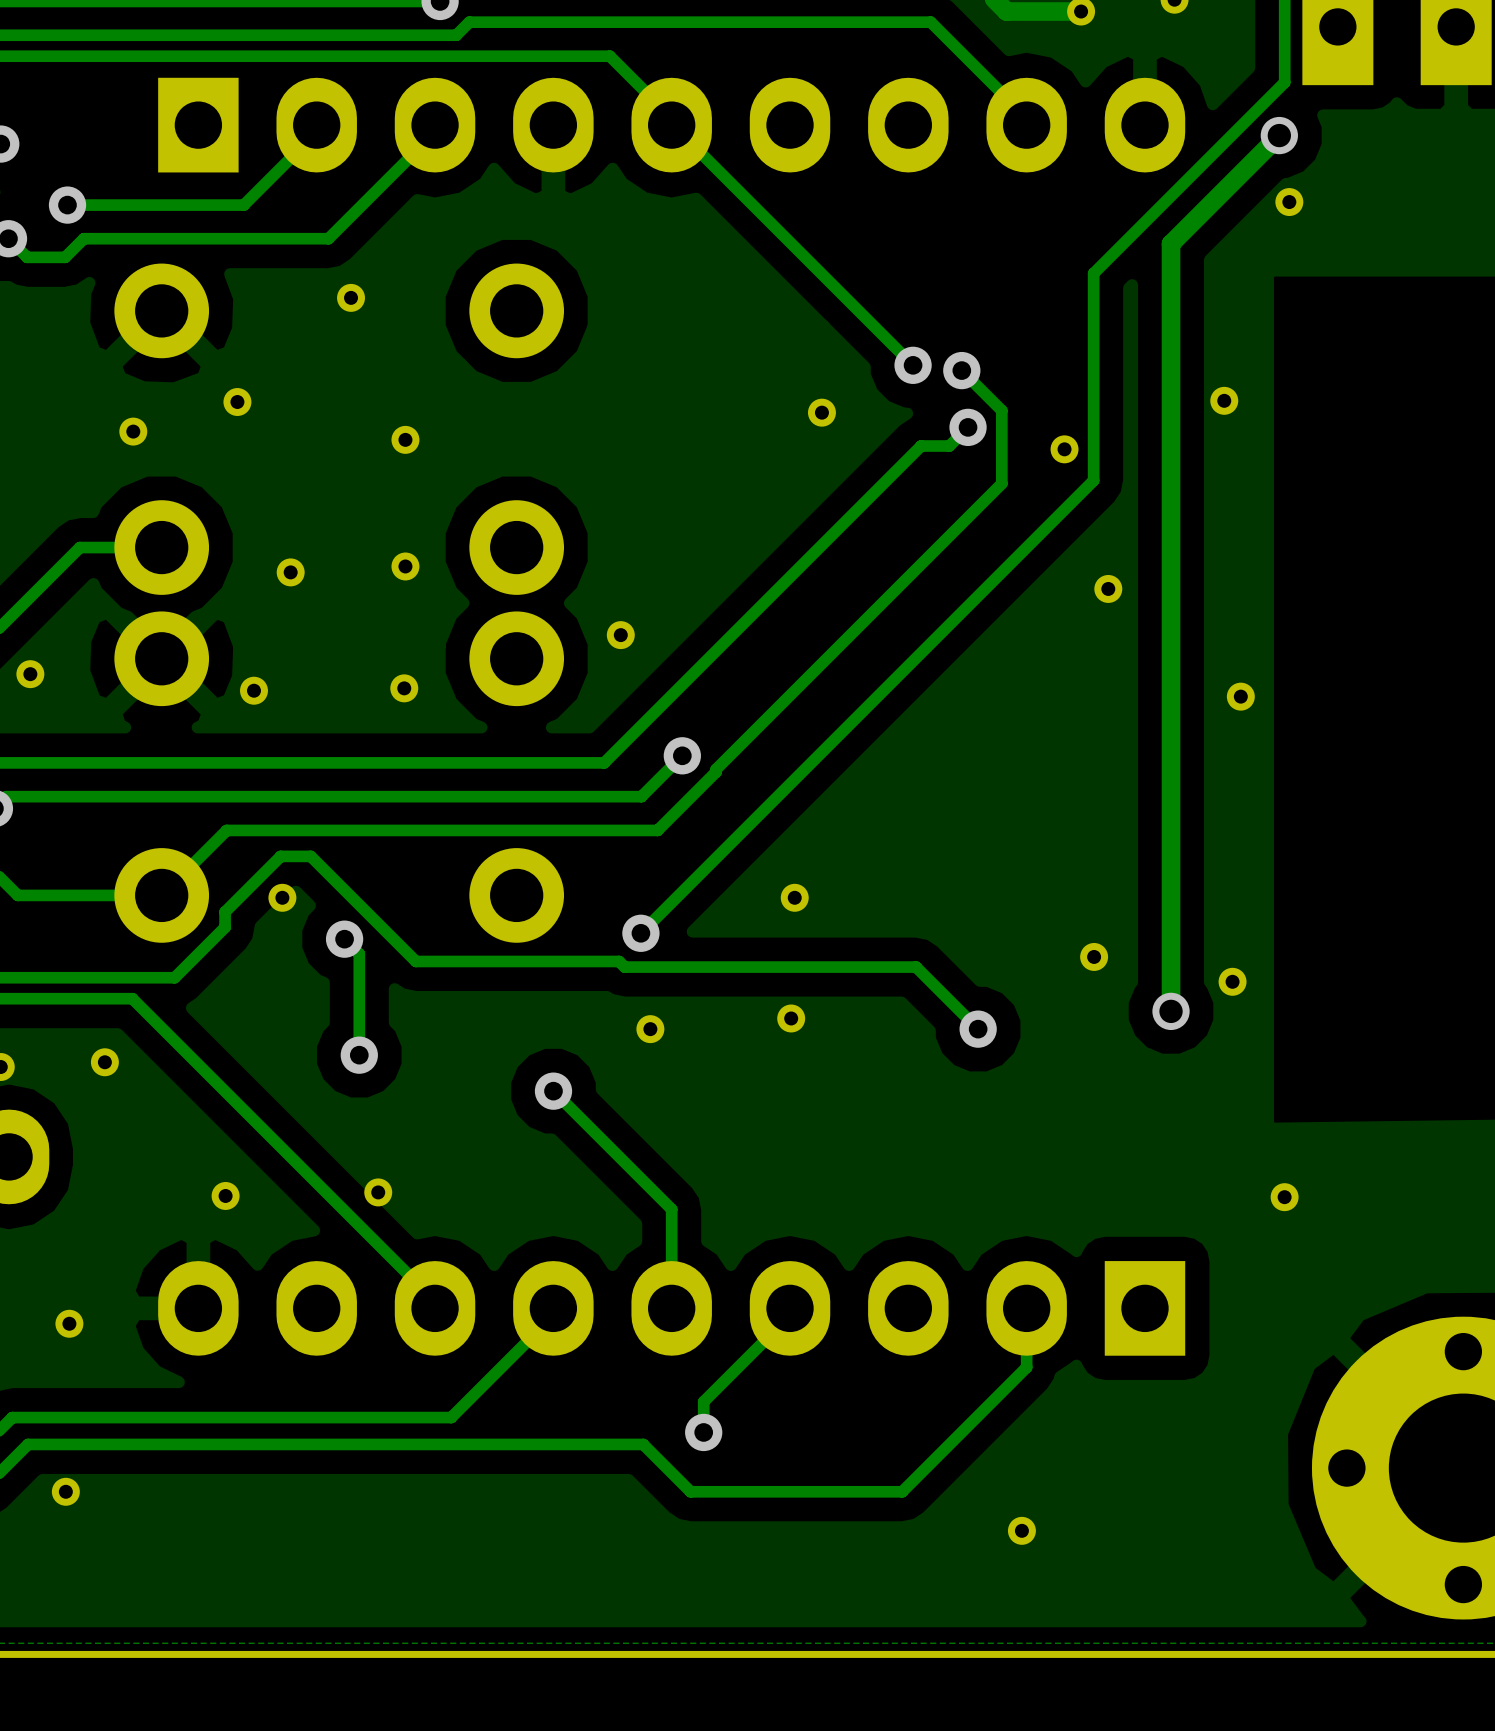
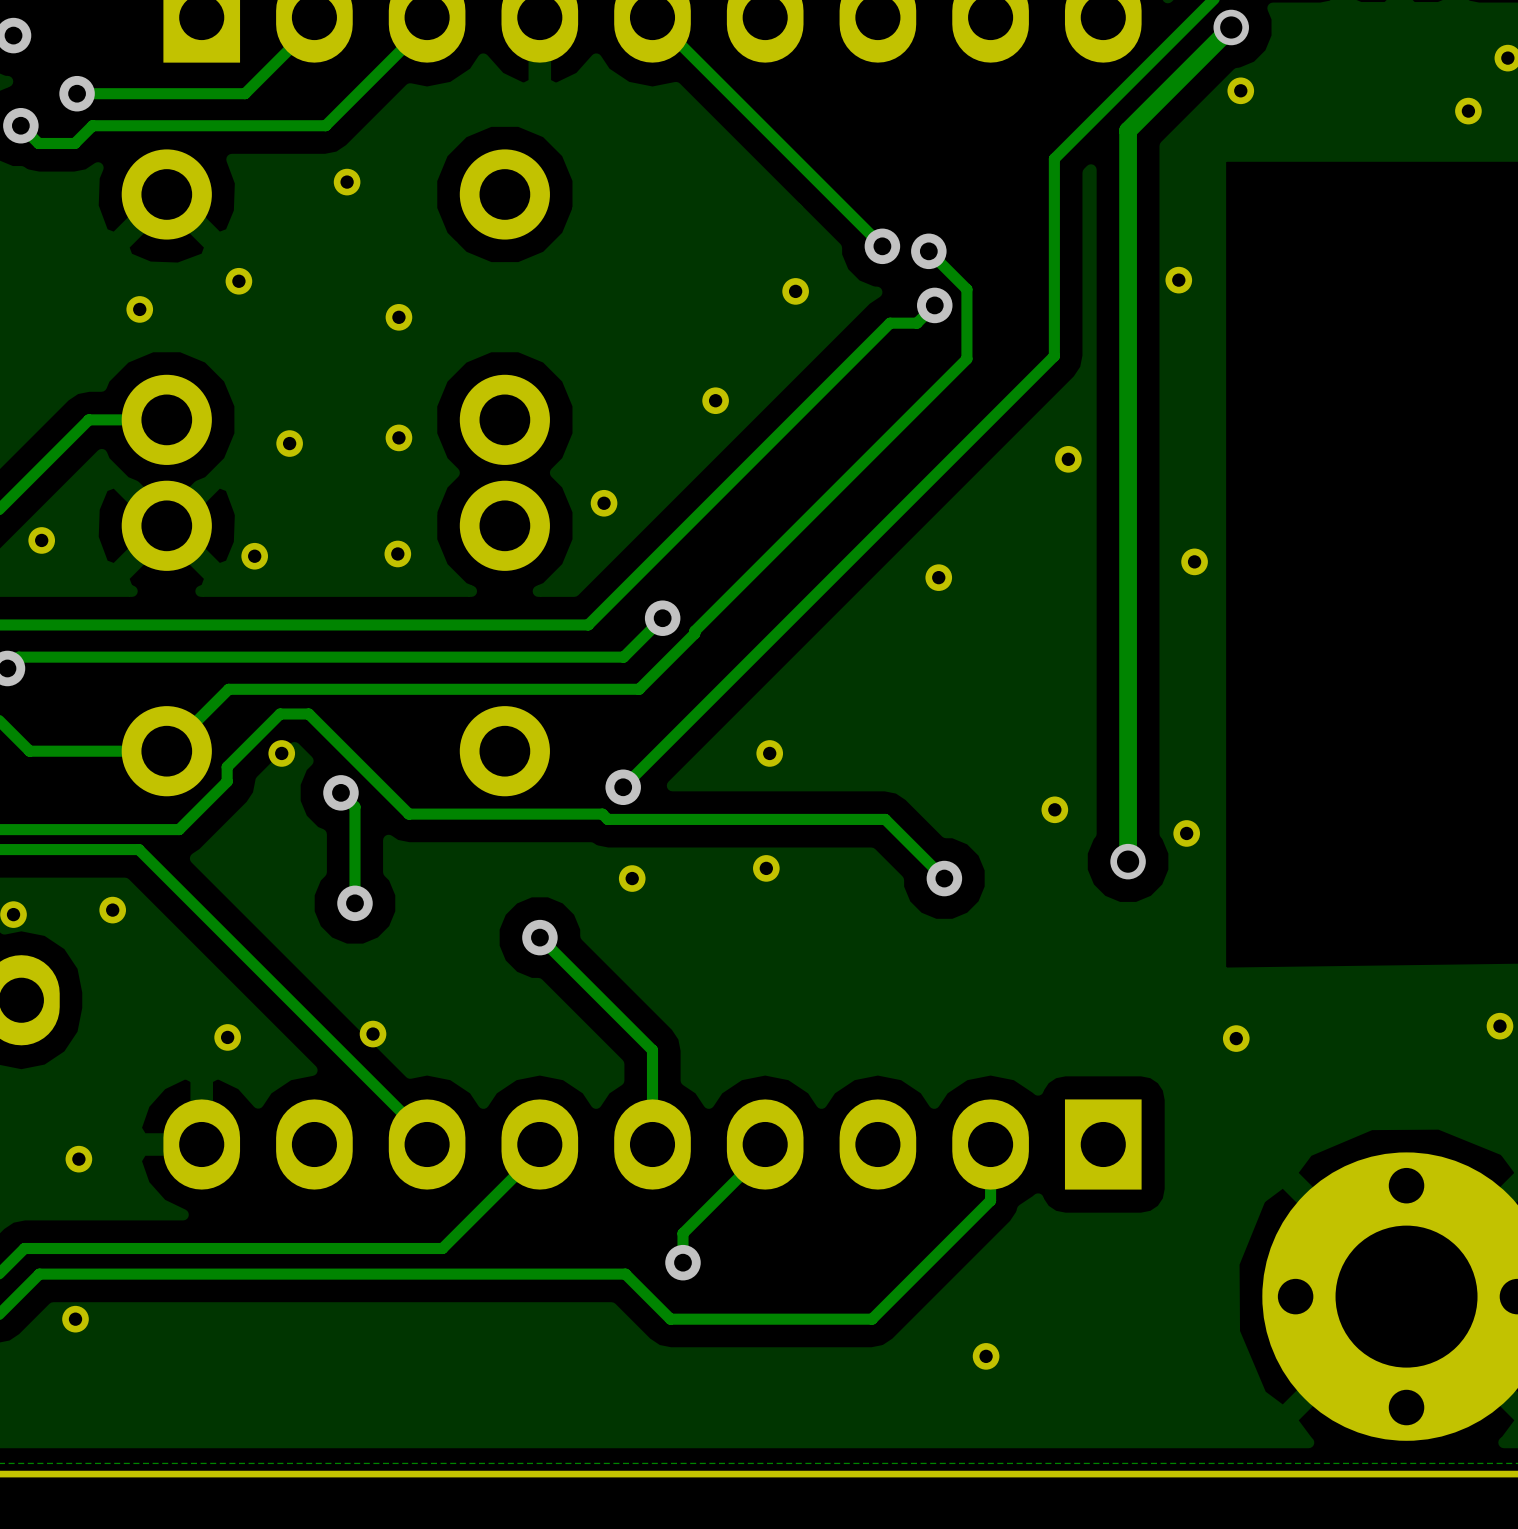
part: (1064, 449) -> none
part: none -> (715, 400)
part: none -> (938, 577)

